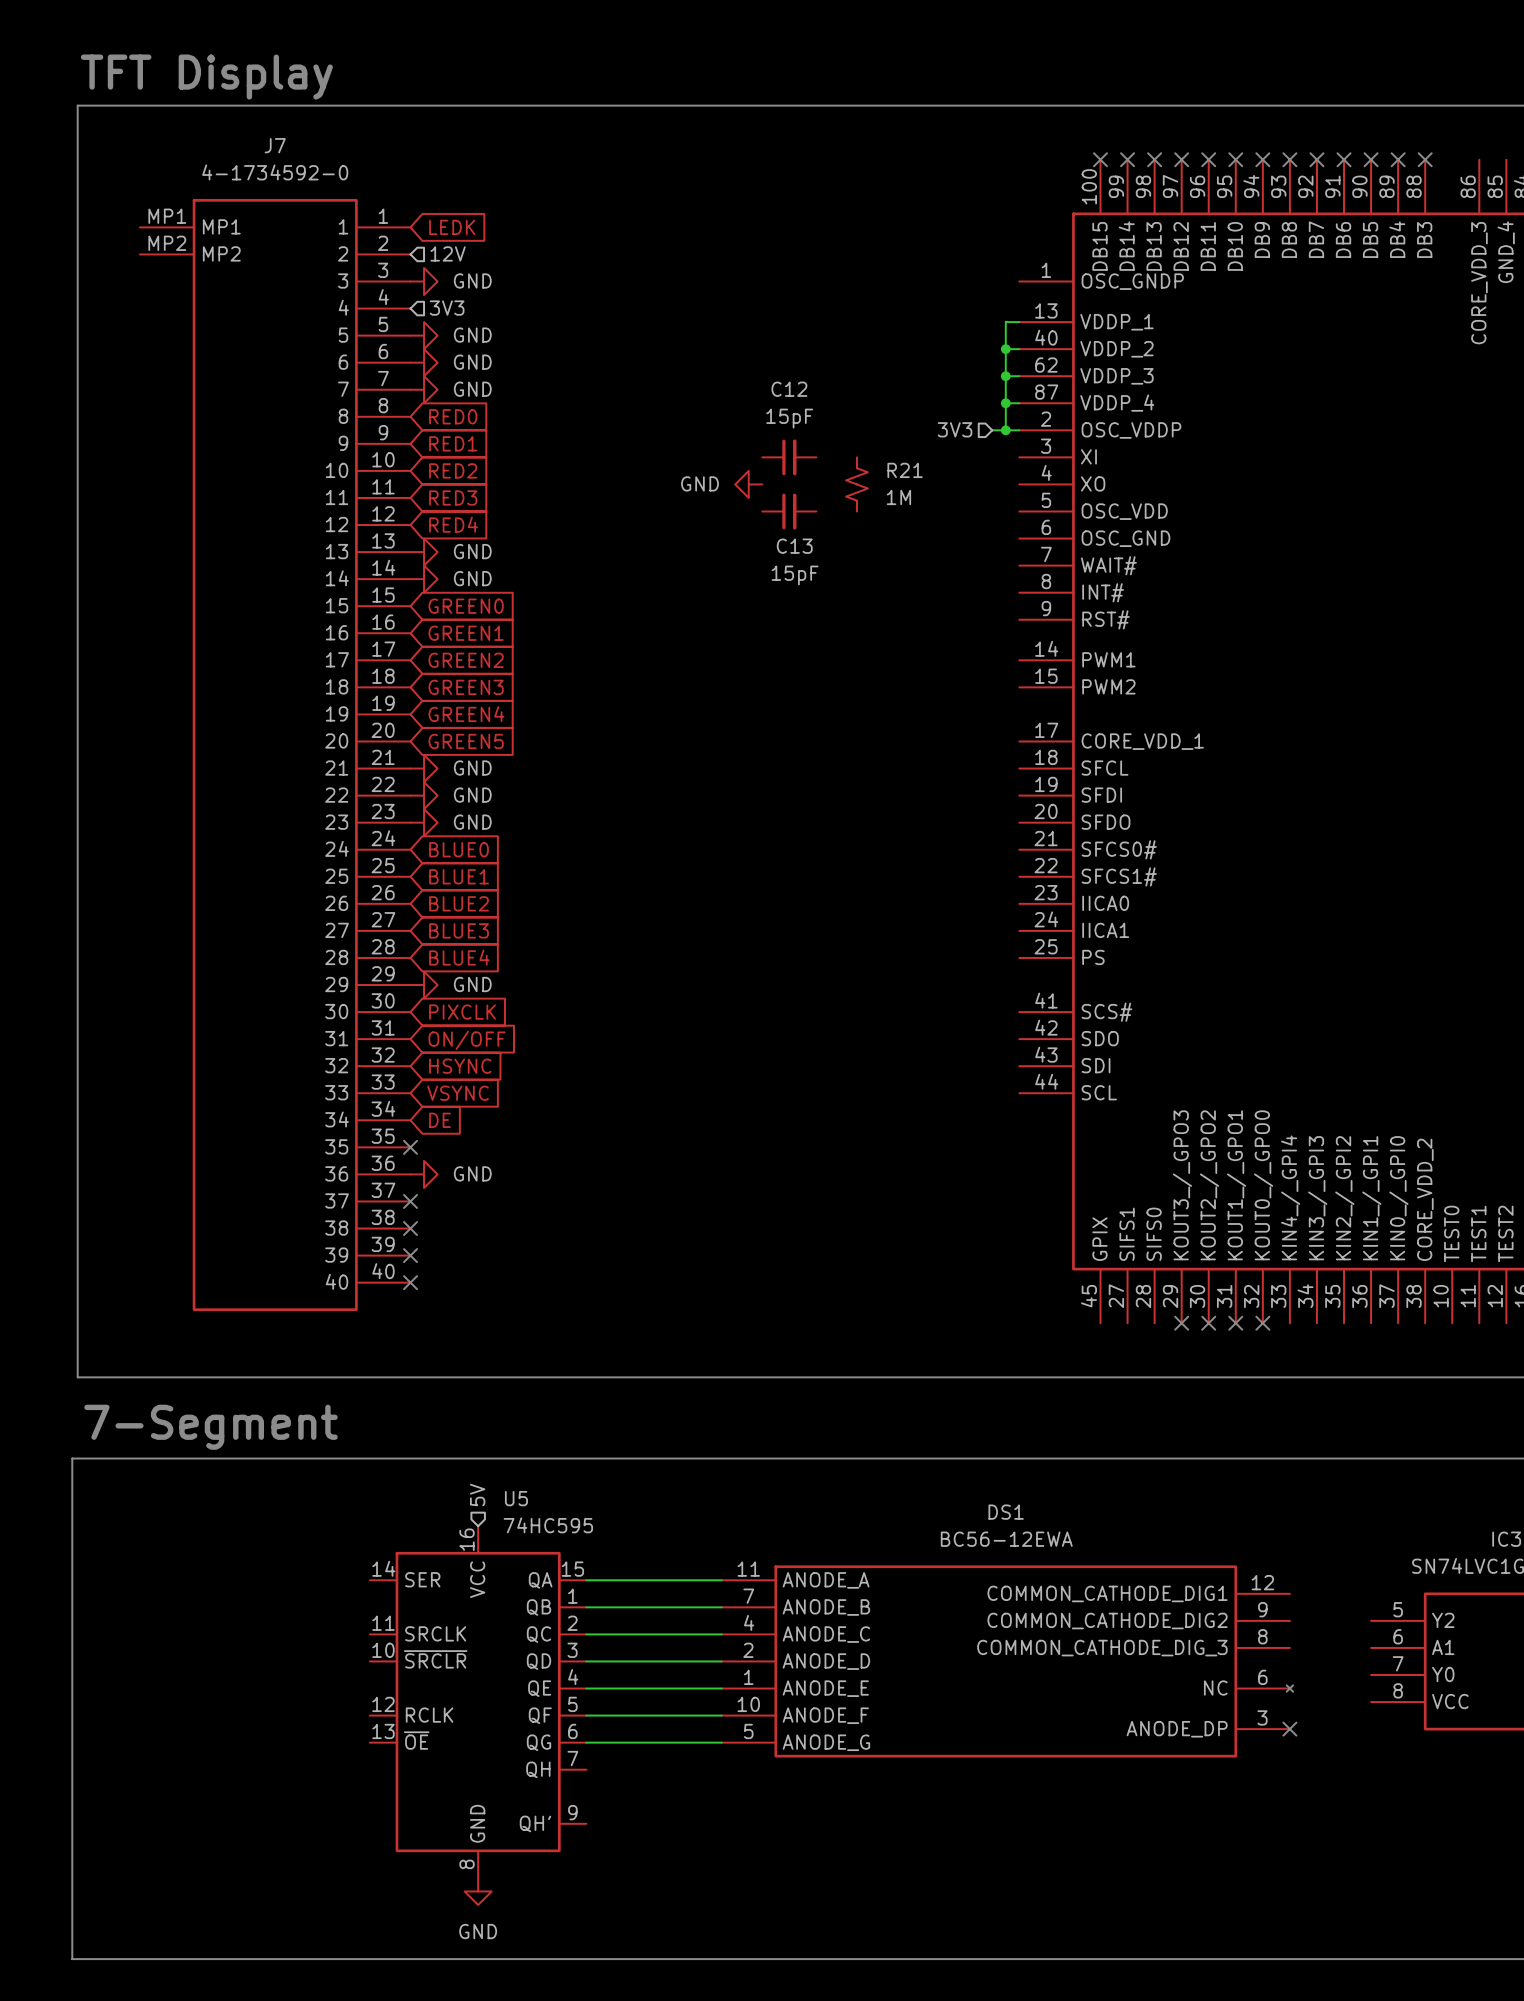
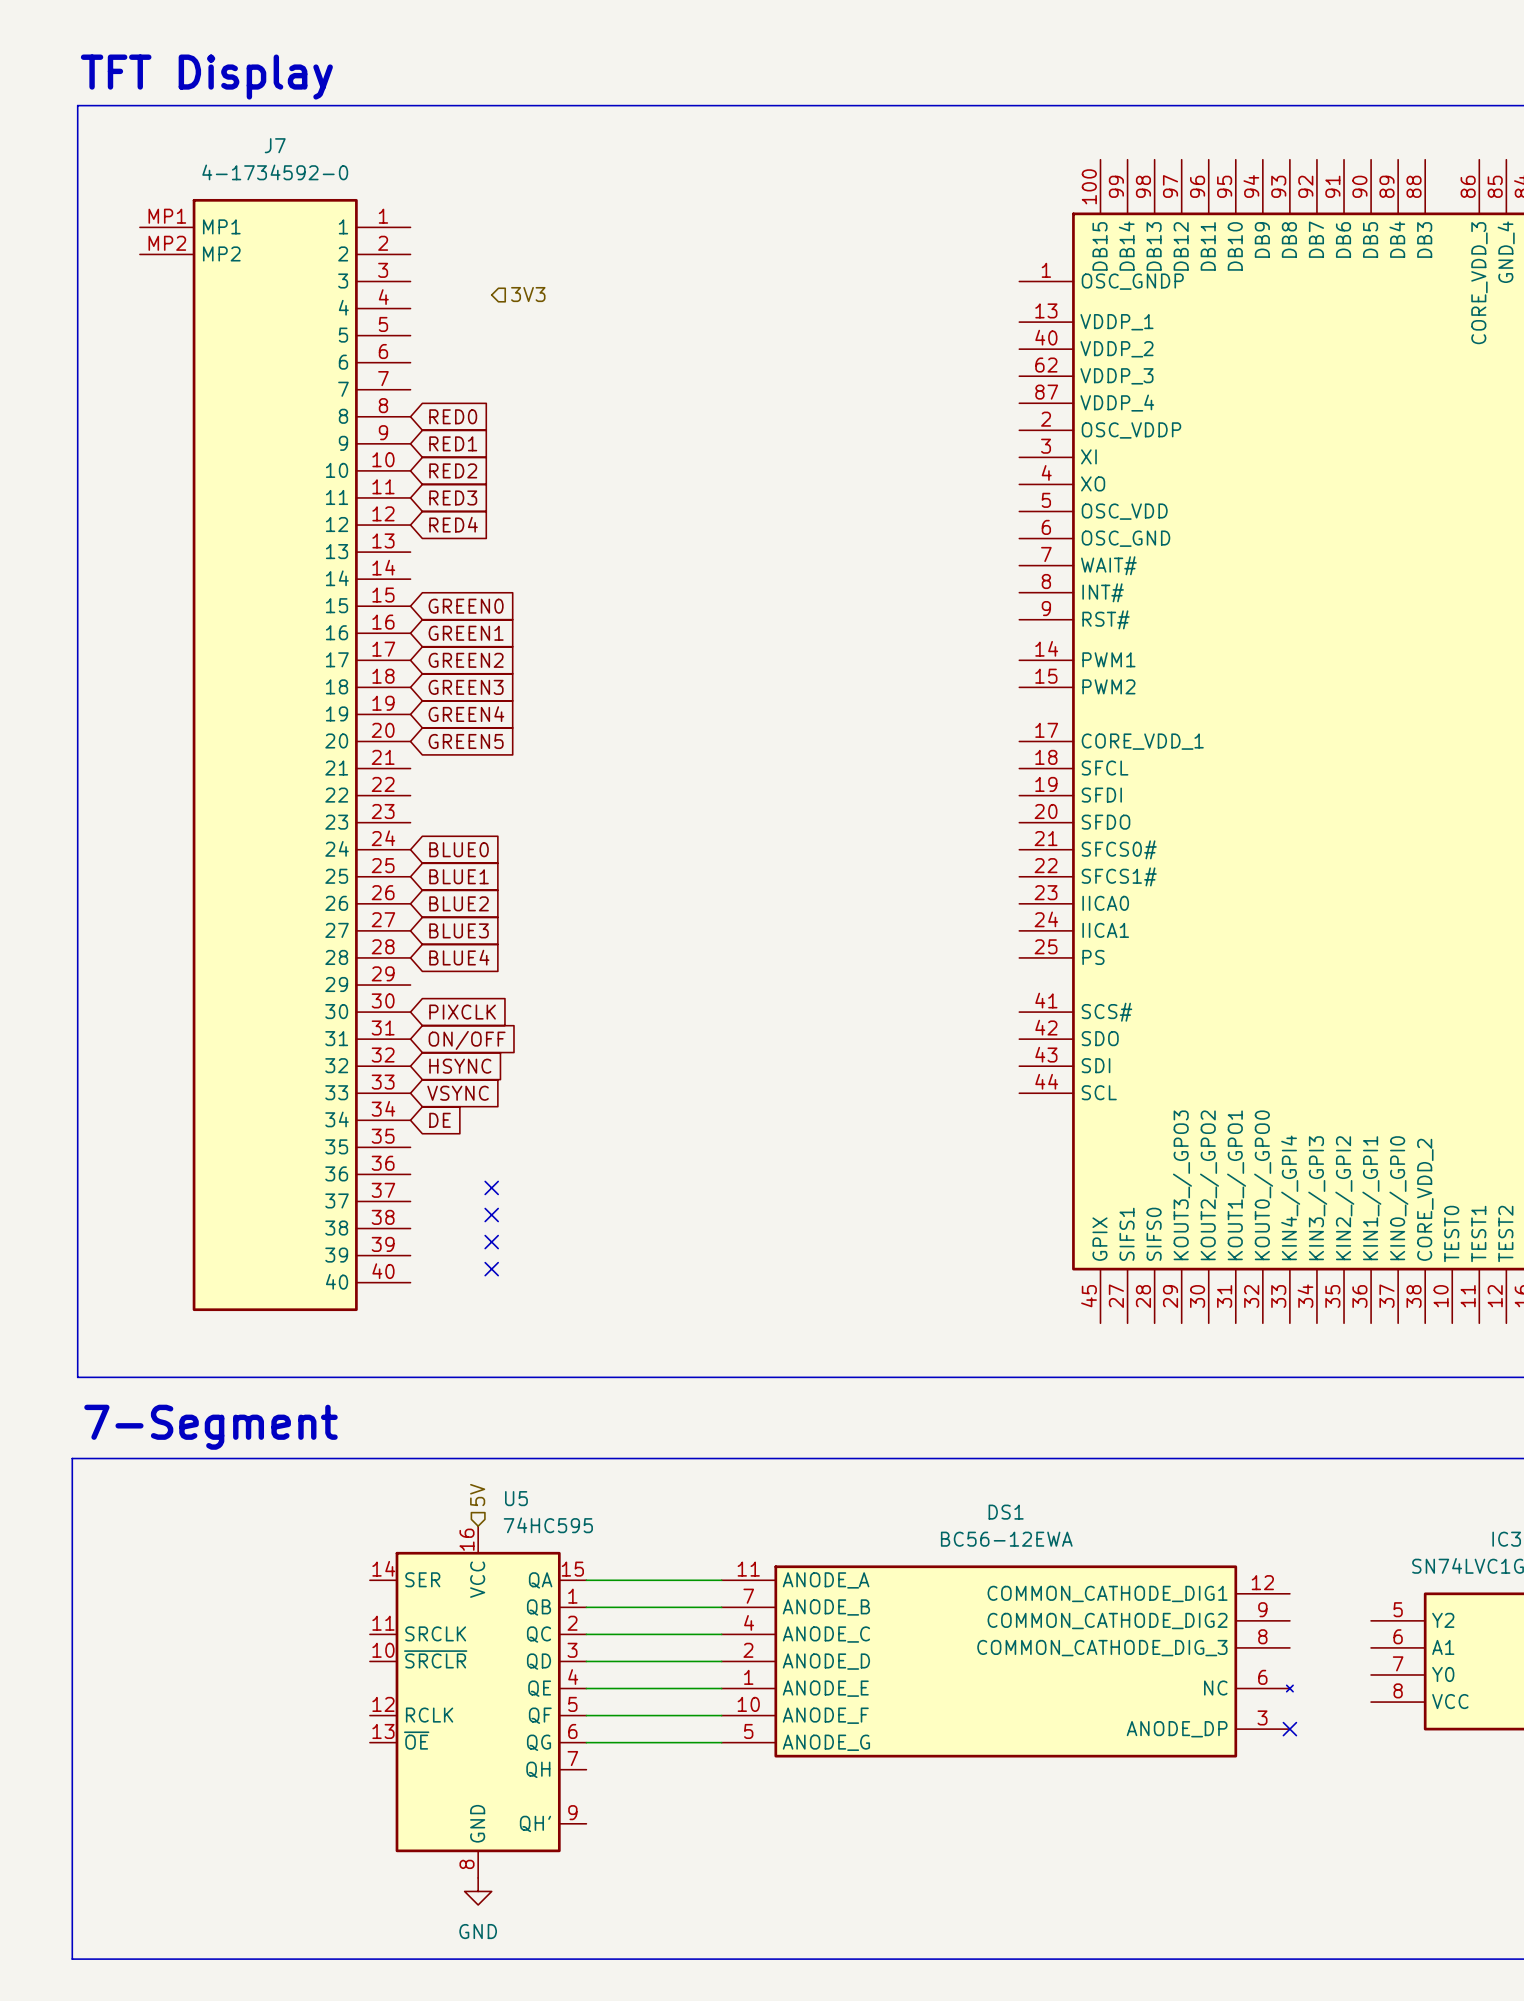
no-connect mark: (1100, 159) -> none
no-connect mark: (1127, 159) -> none
no-connect mark: (1154, 159) -> none
no-connect mark: (1181, 159) -> none
no-connect mark: (1208, 159) -> none
no-connect mark: (1235, 159) -> none
no-connect mark: (1262, 159) -> none
no-connect mark: (1289, 159) -> none
no-connect mark: (1316, 159) -> none
no-connect mark: (1344, 159) -> none
no-connect mark: (1371, 159) -> none
no-connect mark: (1398, 159) -> none
no-connect mark: (1425, 159) -> none
global label: LEDK (452, 227) -> none
hierarchical label: 12V (448, 253) -> none
power symbol: GND (424, 281) -> none
hierarchical label position: 3V3 (447, 308) -> 3V3 (528, 294)
wire: (1019, 322) (1005, 322) (1005, 430) -> none
power symbol: GND (424, 335) -> none
wire: (1005, 349) (1019, 349) -> none
junction: (1005, 349) -> none
power symbol: GND (424, 362) -> none
wire: (1005, 376) (1019, 376) -> none
junction: (1005, 376) -> none
power symbol: GND (424, 389) -> none
wire: (1005, 403) (1019, 403) -> none
junction: (1005, 403) -> none
hierarchical label: 3V3 (955, 429) -> none
wire: (992, 430) (1019, 430) -> none
junction: (1005, 430) -> none
C12: 15pF (789, 457) -> none
power symbol: GND (748, 484) -> none
R21: 1M (856, 484) -> none
C13: 15pF (789, 511) -> none
power symbol: GND (424, 552) -> none
power symbol: GND (424, 579) -> none
power symbol: GND (424, 768) -> none
power symbol: GND (424, 795) -> none
power symbol: GND (424, 822) -> none
power symbol: GND (424, 985) -> none
no-connect mark: (410, 1147) -> none
power symbol: GND (424, 1174) -> none
no-connect mark: none -> (491, 1187)
no-connect mark: (410, 1201) -> none
no-connect mark: none -> (491, 1215)
no-connect mark: (410, 1228) -> none
no-connect mark: none -> (491, 1242)
no-connect mark: (410, 1255) -> none
no-connect mark: none -> (491, 1269)
no-connect mark: (410, 1282) -> none
no-connect mark: (1181, 1323) -> none
no-connect mark: (1208, 1323) -> none
no-connect mark: (1235, 1323) -> none
no-connect mark: (1262, 1323) -> none

